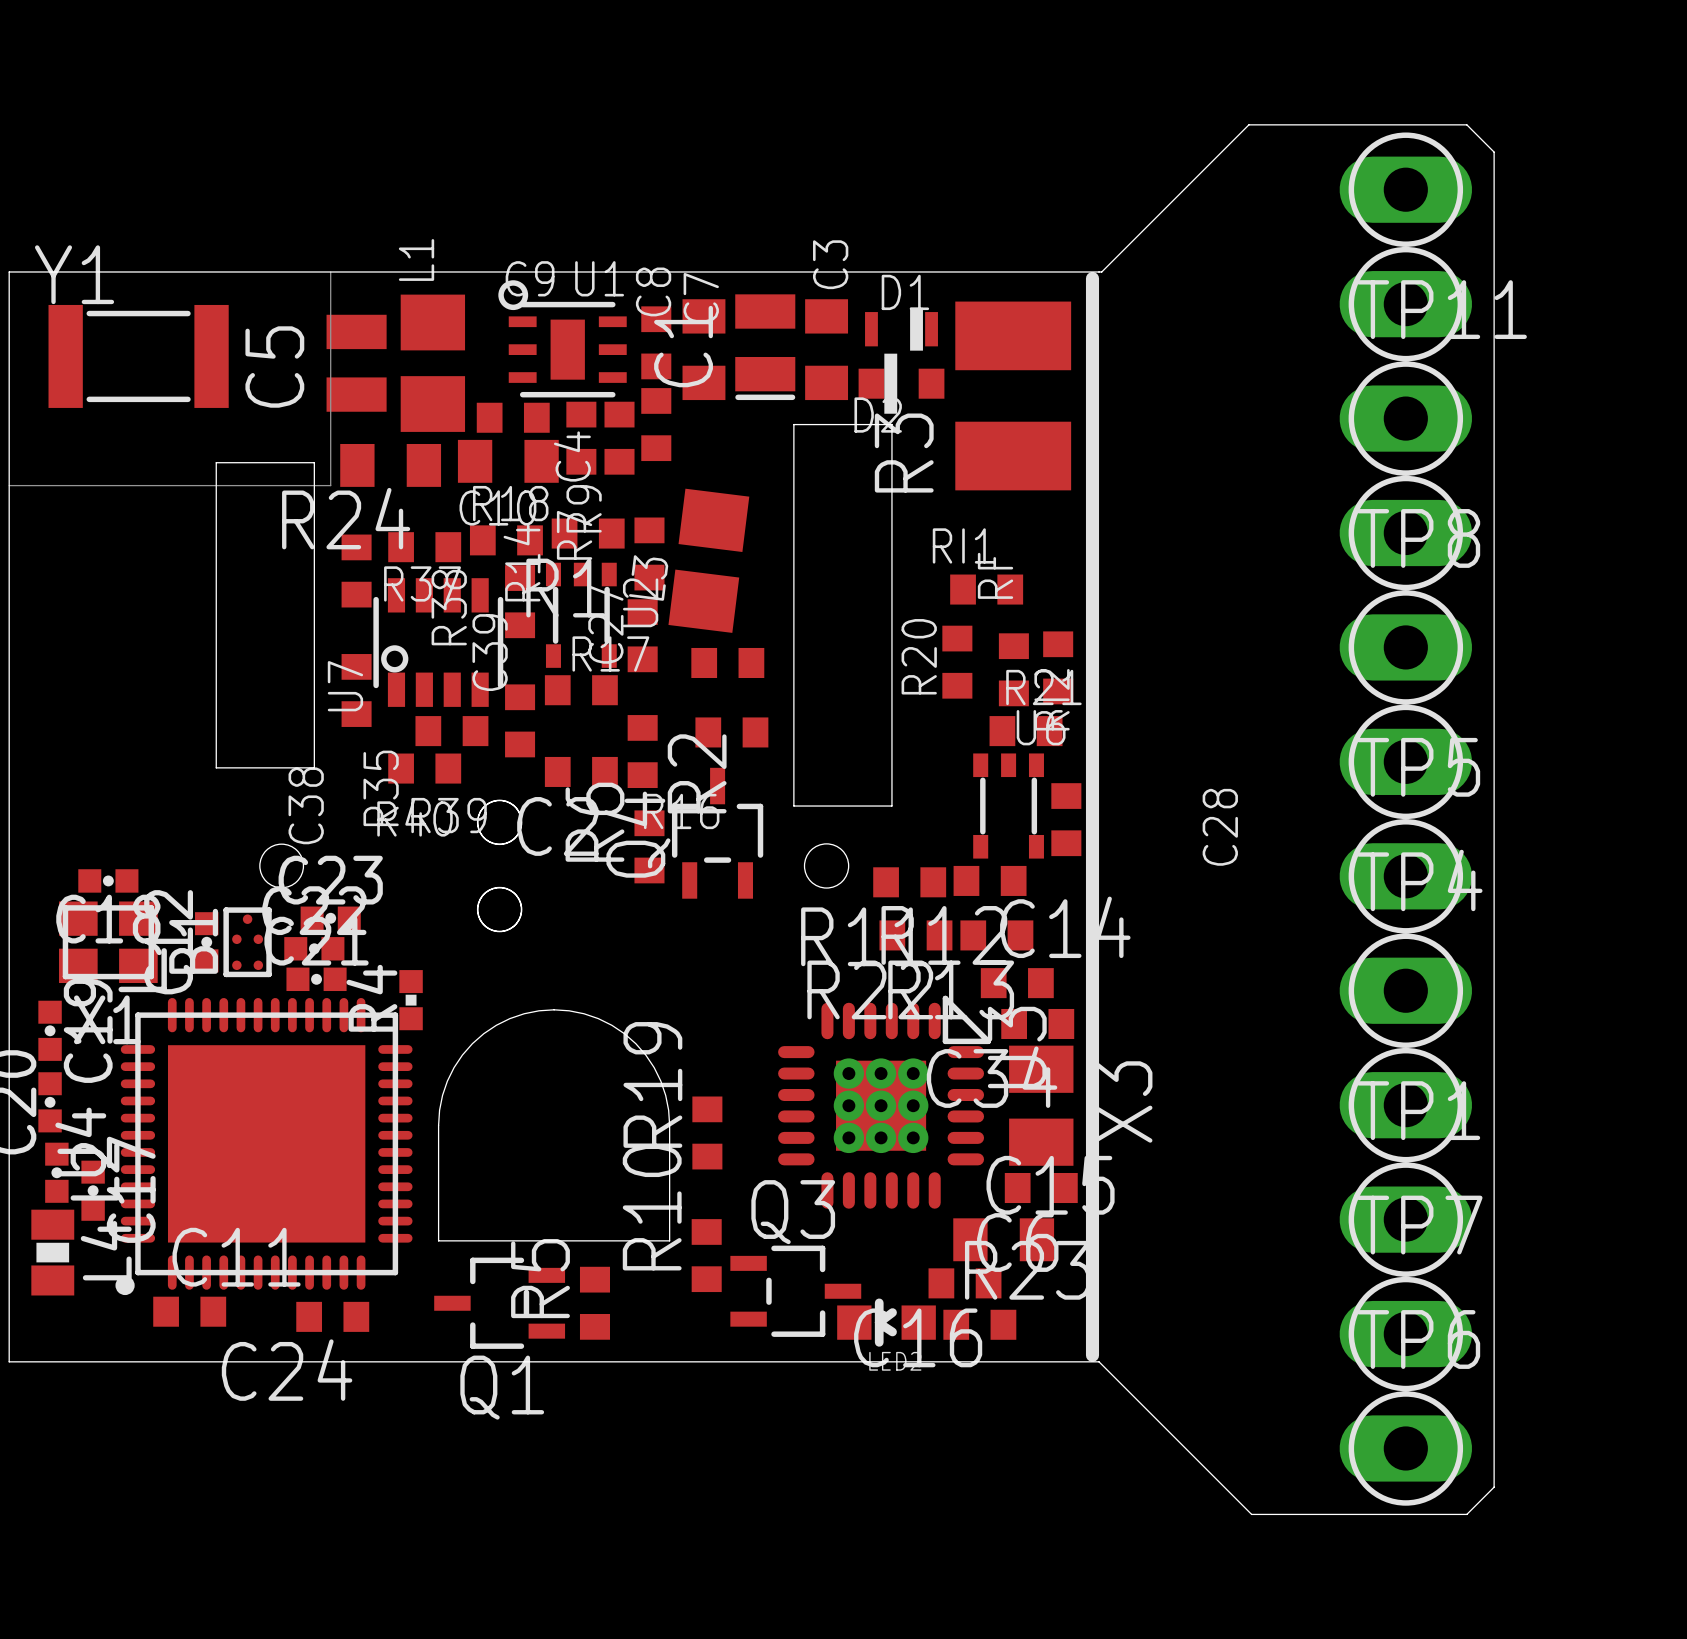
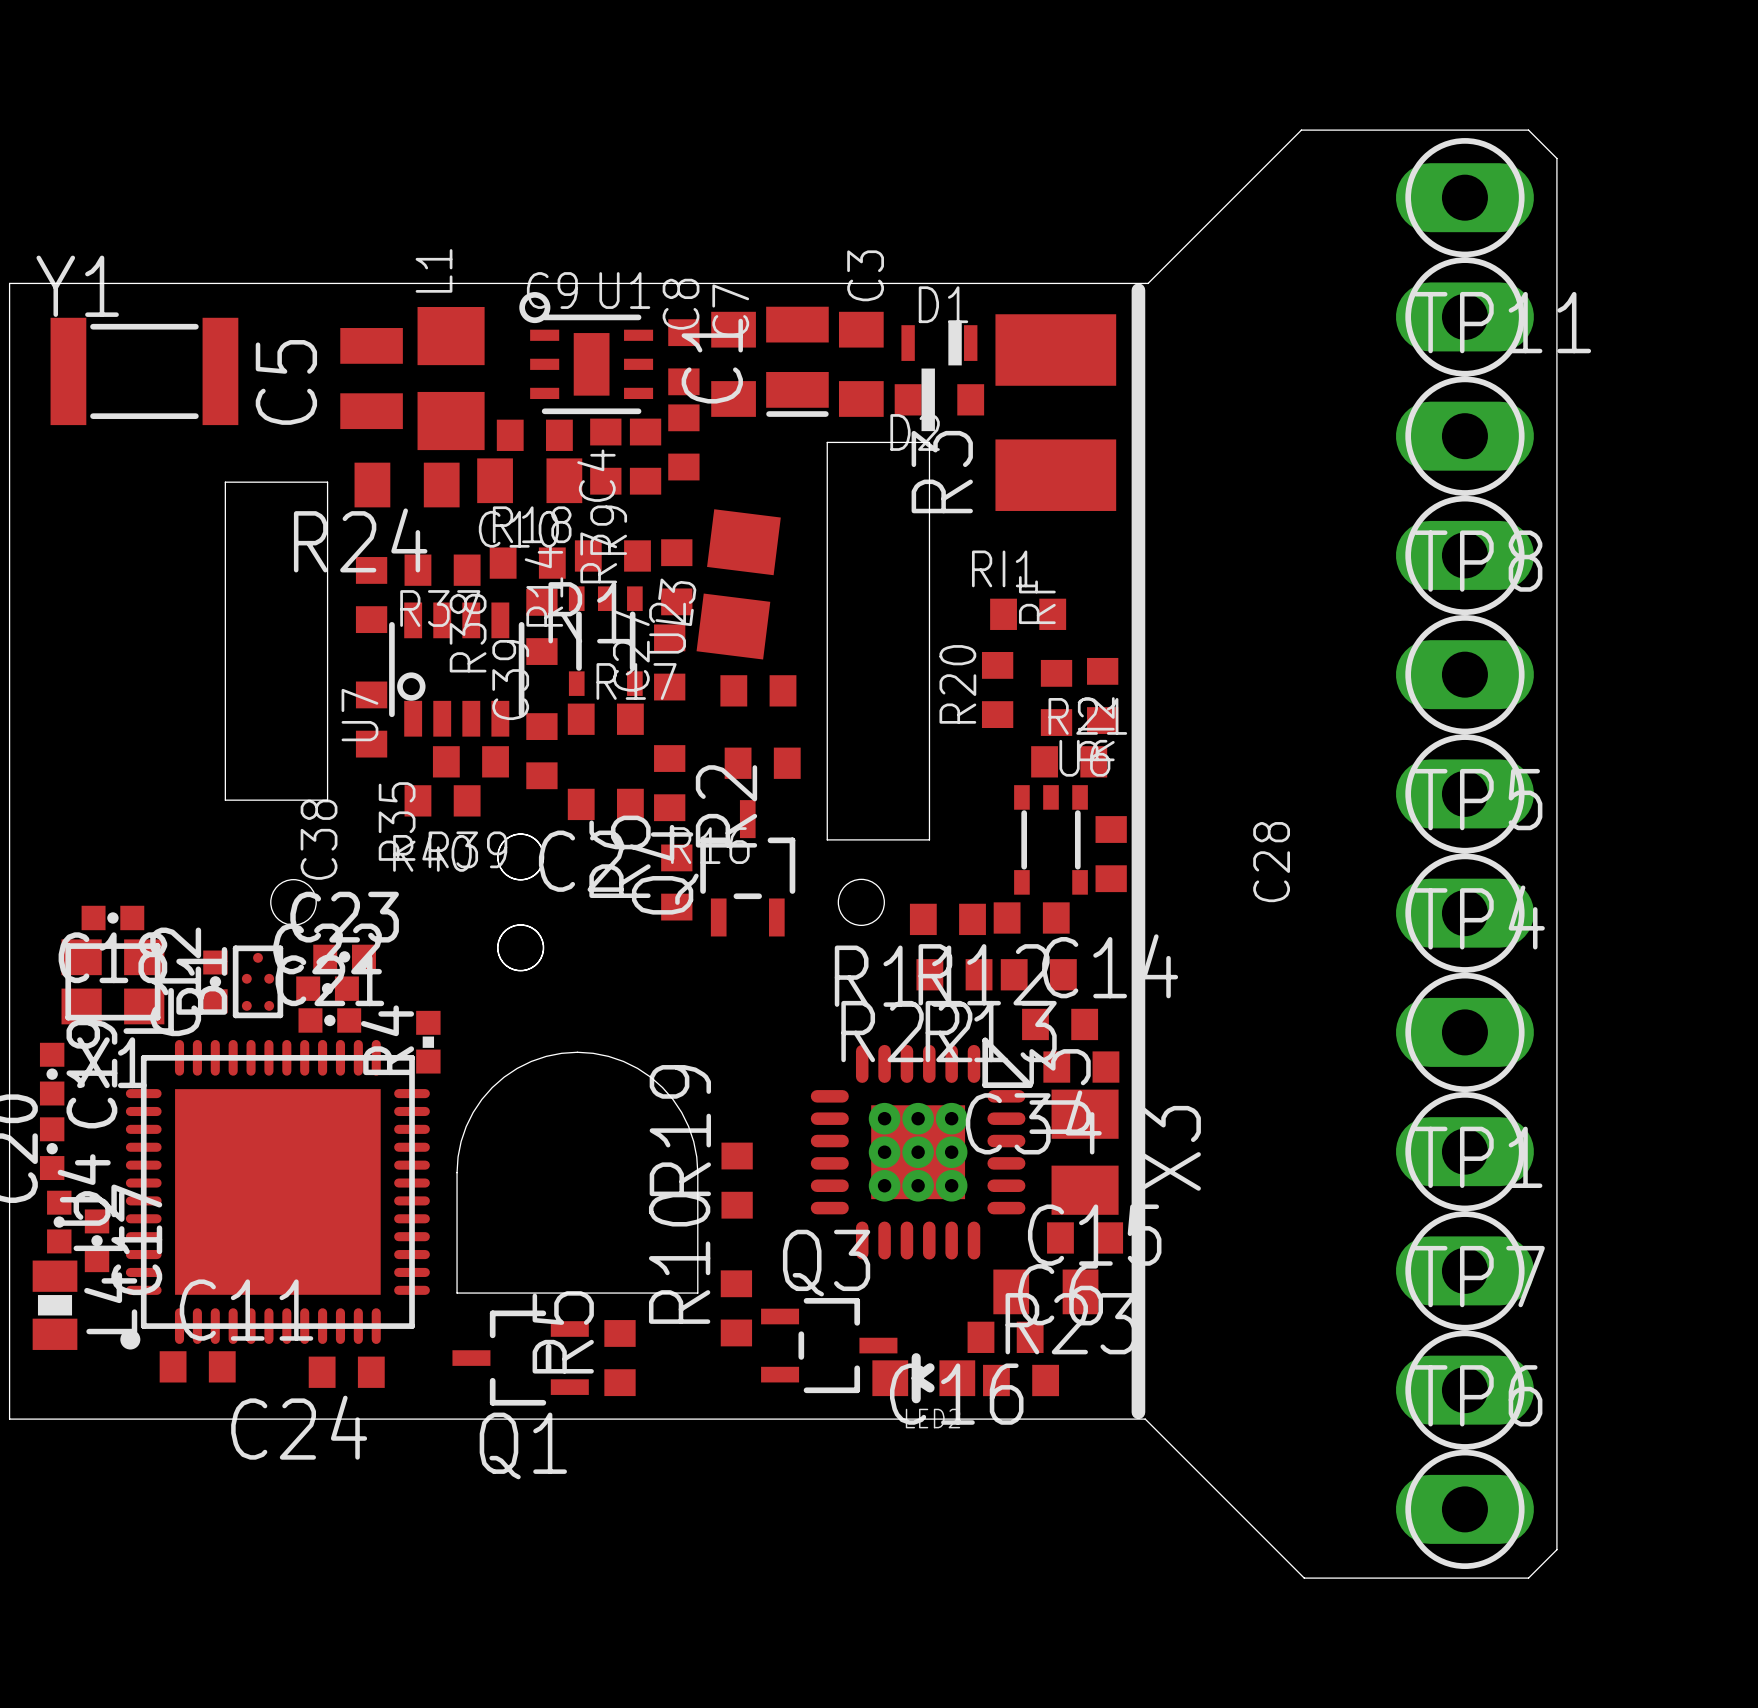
line: (330, 271) (330, 485) (9, 485) -> none

